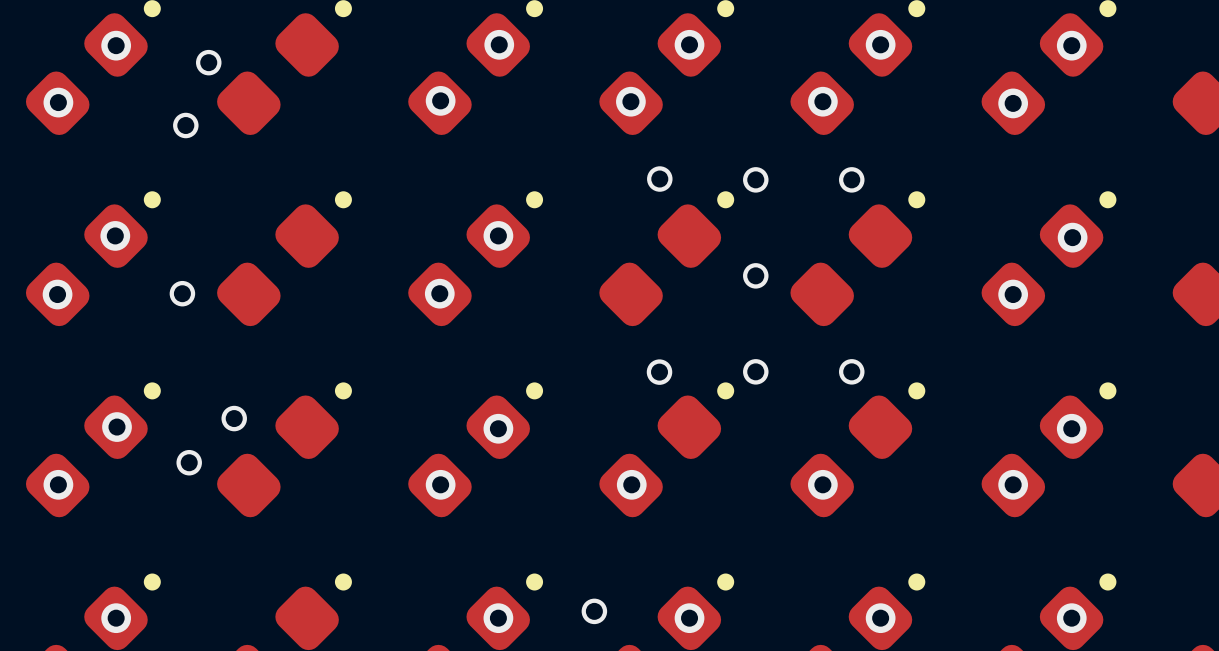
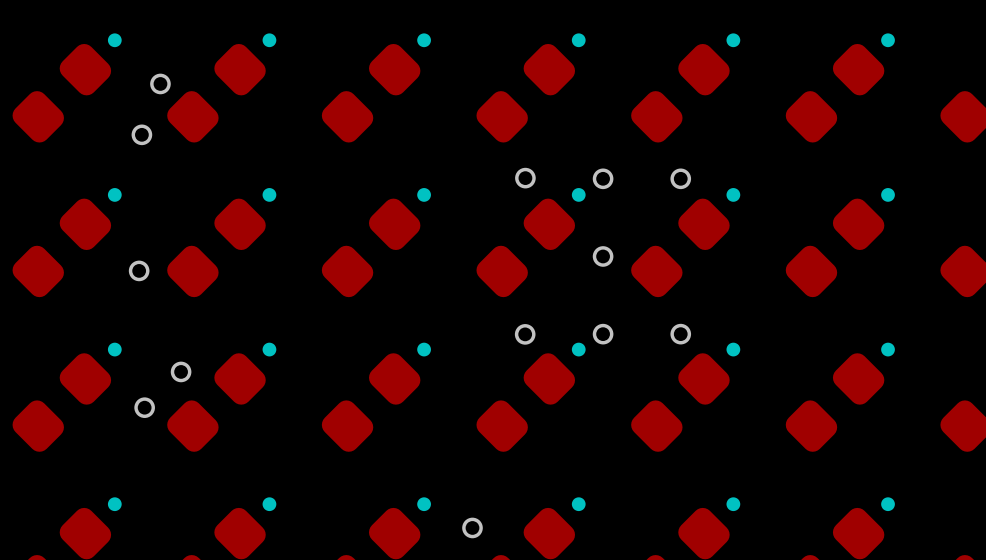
via: (499, 44) -> none
via: (689, 44) -> none
via: (880, 44) -> none
via: (116, 45) -> none
via: (1071, 45) -> none
via: (440, 100) -> none
via: (630, 101) -> none
via: (822, 101) -> none
via: (58, 102) -> none
via: (1013, 103) -> none
via: (115, 235) -> none
via: (498, 235) -> none
via: (1072, 237) -> none
via: (439, 293) -> none
via: (57, 294) -> none
via: (1013, 294) -> none
via: (117, 427) -> none
via: (498, 428) -> none
via: (1071, 428) -> none
via: (58, 484) -> none
via: (440, 484) -> none
via: (631, 484) -> none
via: (822, 484) -> none
via: (1013, 484) -> none
via: (116, 618) -> none
via: (498, 618) -> none
via: (689, 618) -> none
via: (880, 618) -> none
via: (1071, 618) -> none

